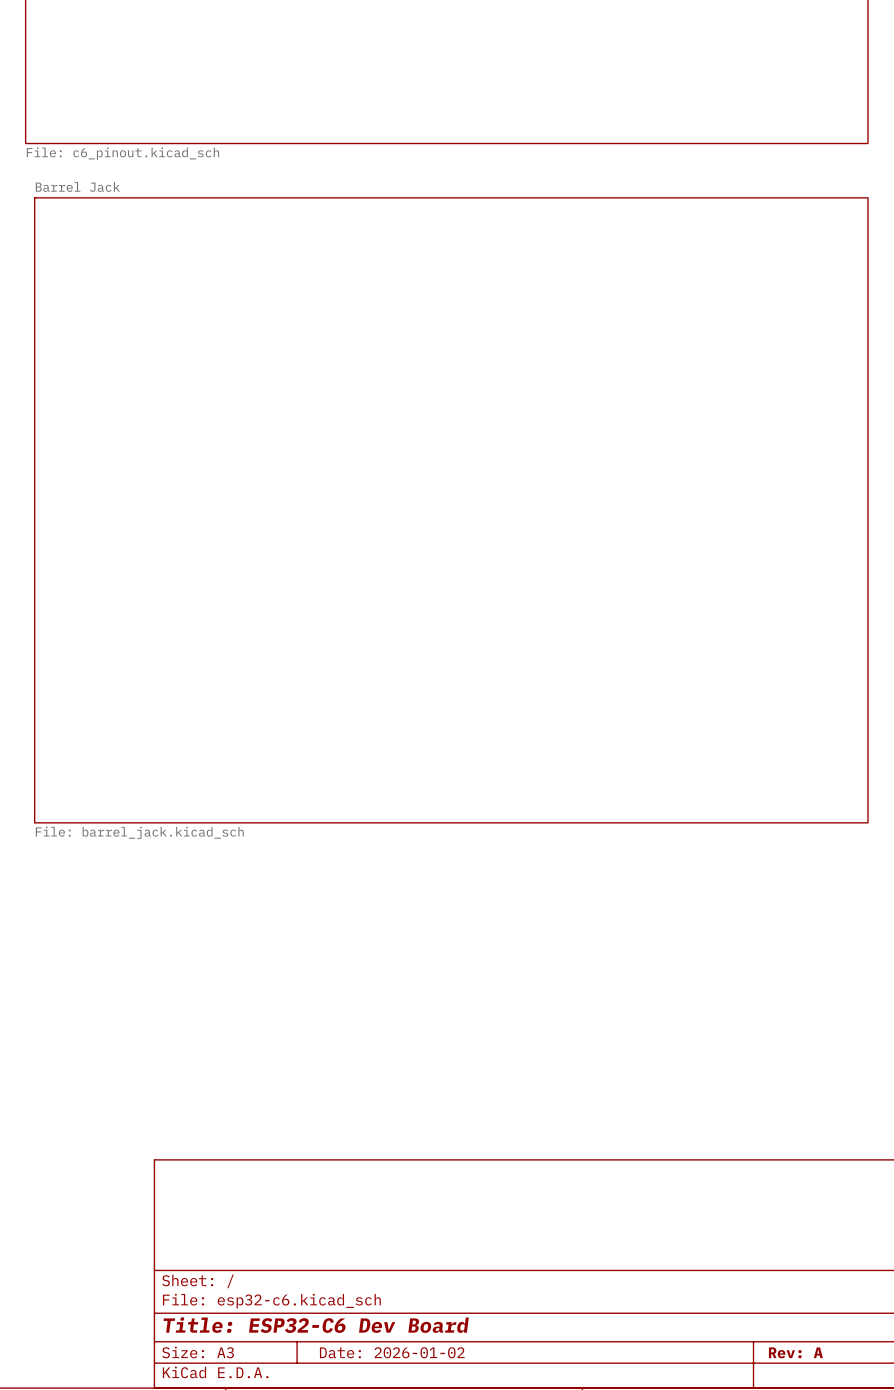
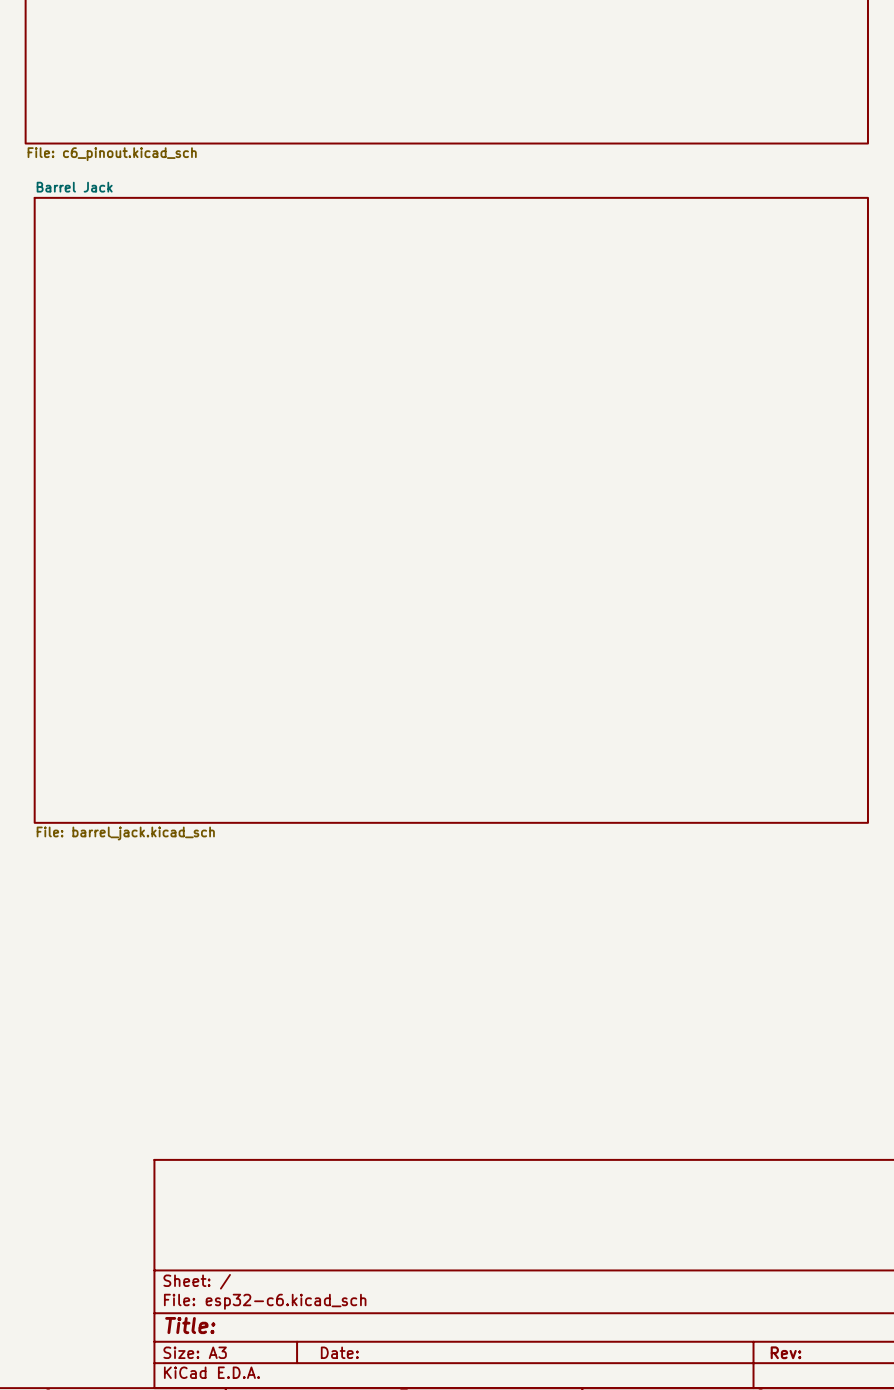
title block: Title: ESP32-C6 Dev Board (316, 1325) -> Title: (190, 1325)
title block: Date: 2026-01-02 (392, 1352) -> Date: (339, 1352)
title block: Rev: A (795, 1352) -> Rev: (786, 1352)

